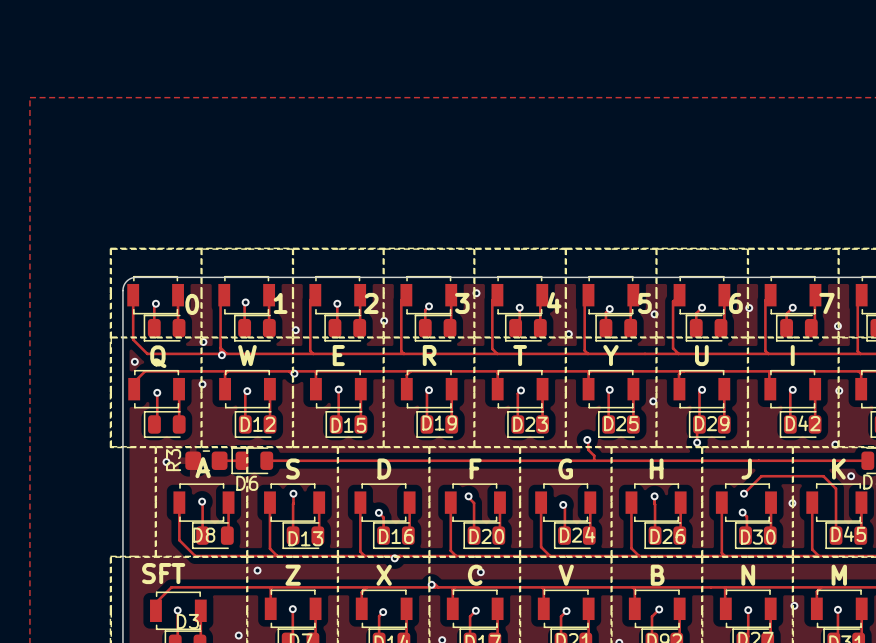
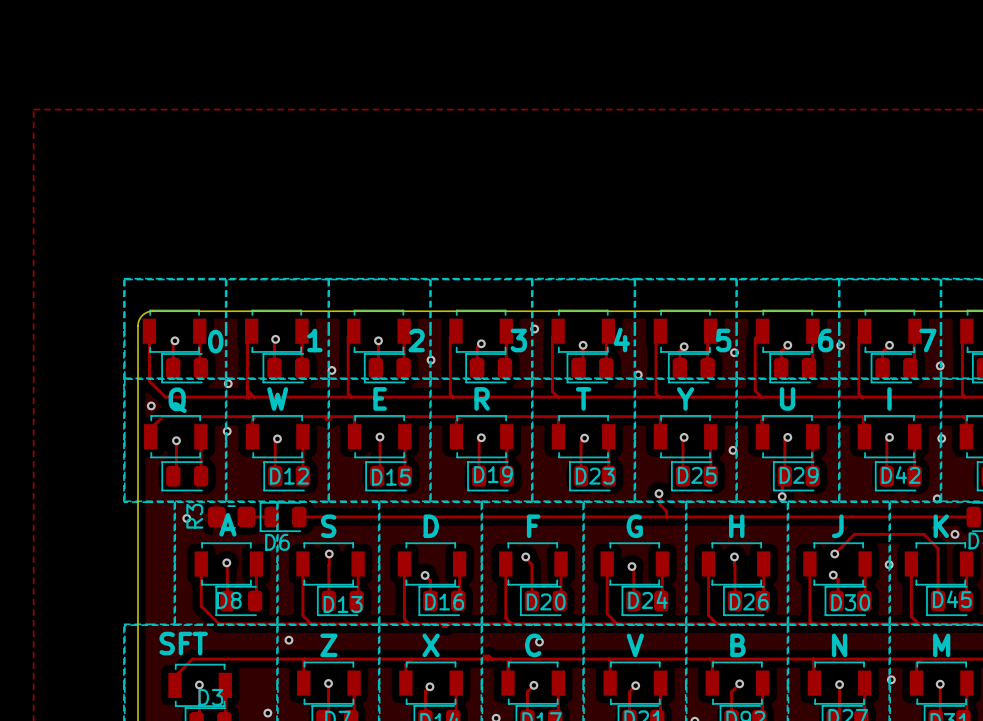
via: (221, 355) -> none
via: (294, 373) -> none
via: (394, 558) -> none
via: (431, 584) -> none

